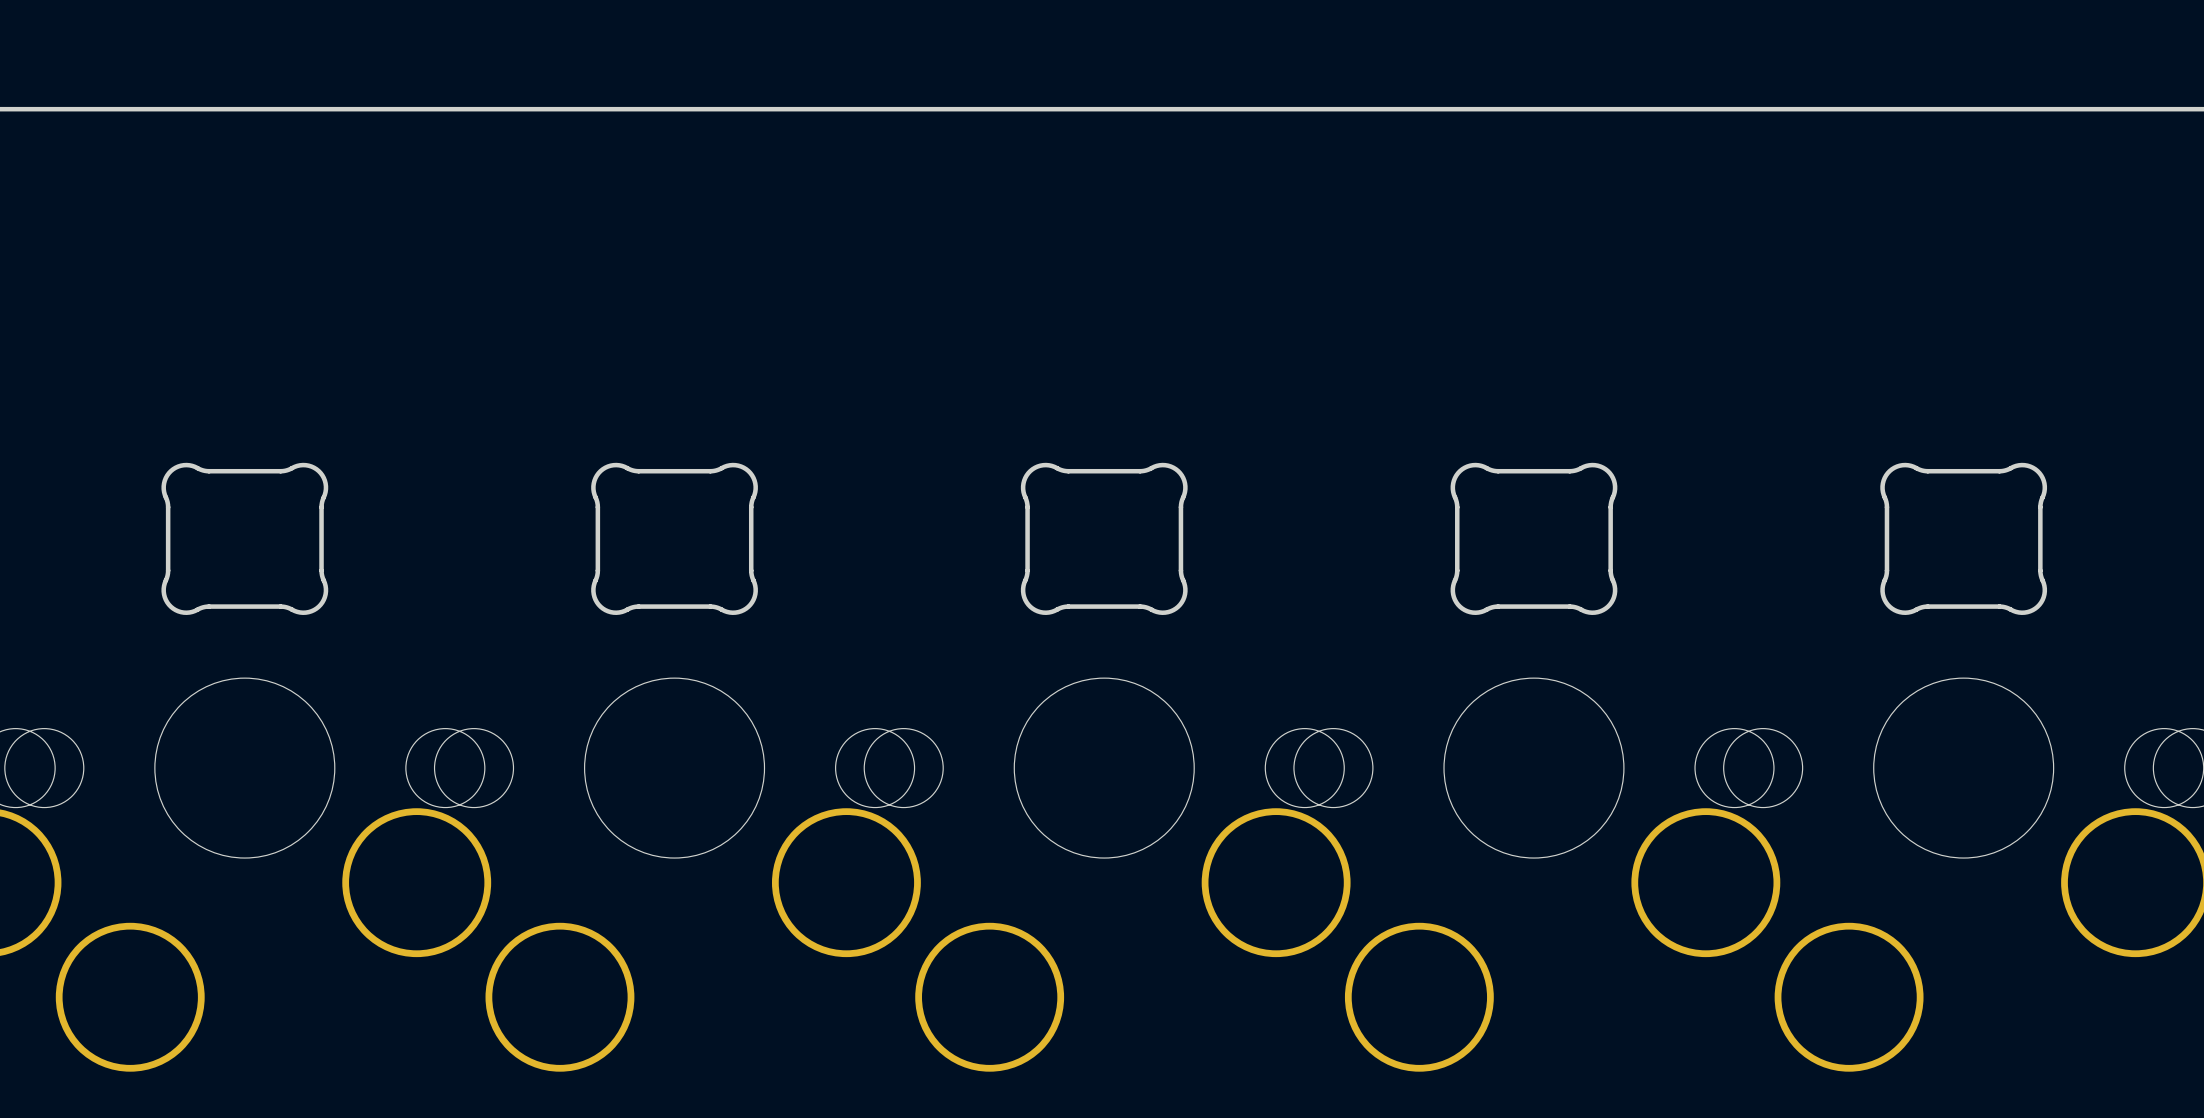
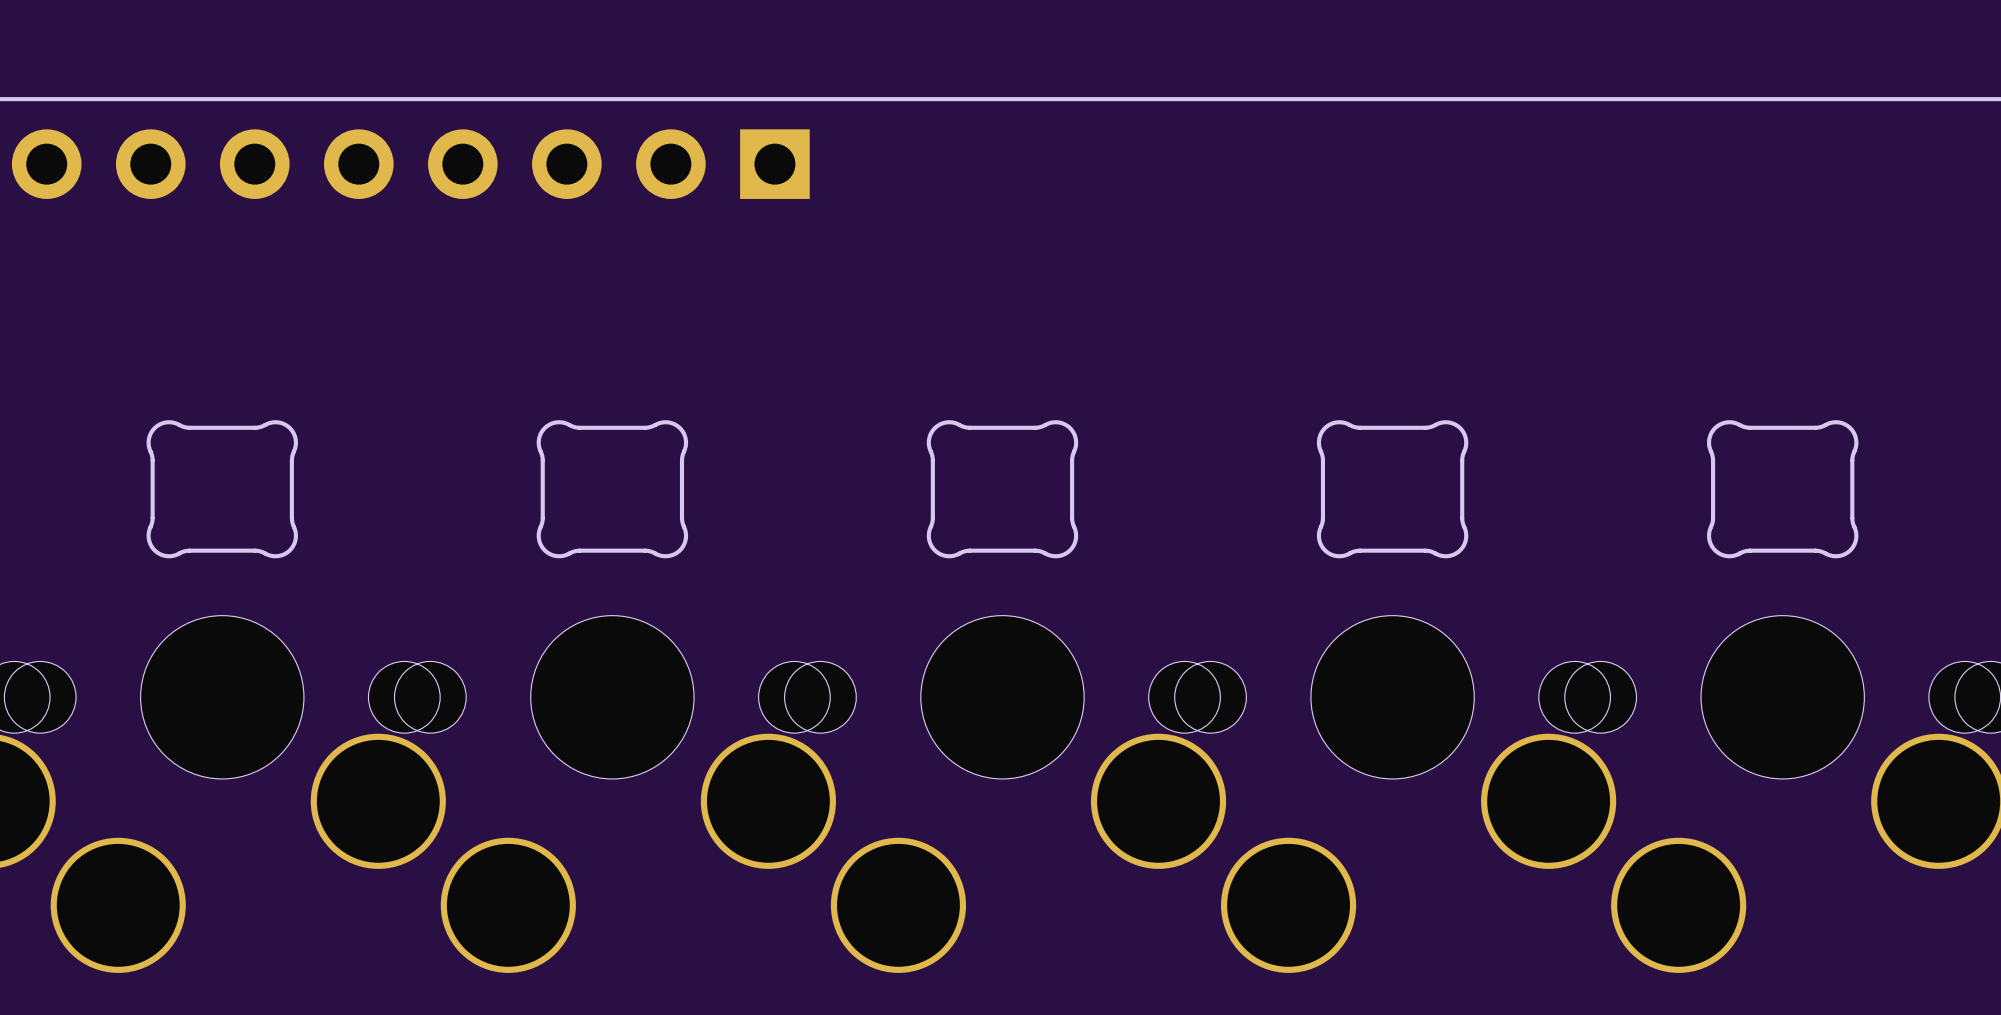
part: none -> (410, 164)

